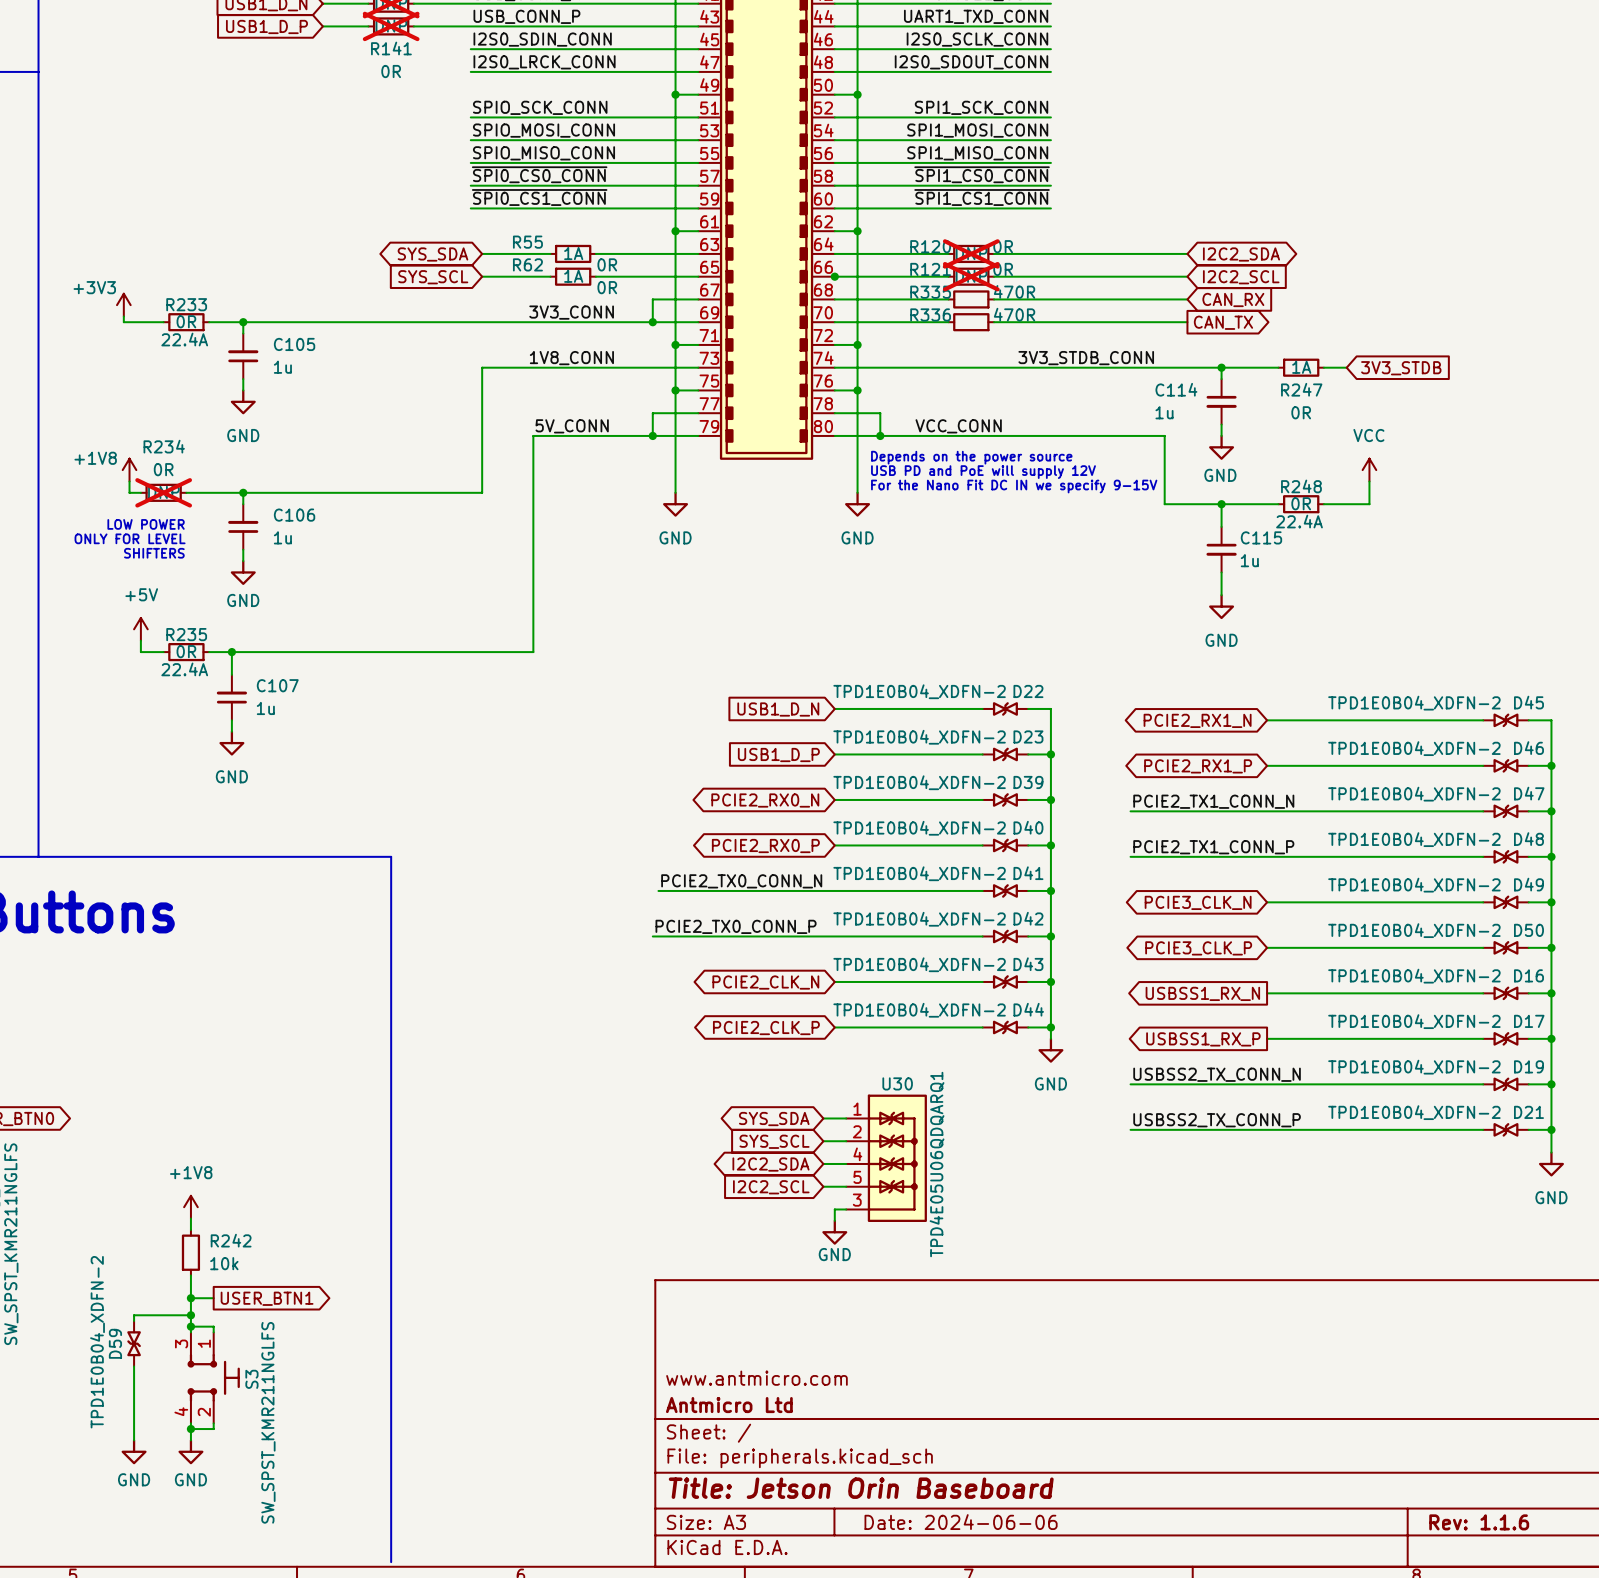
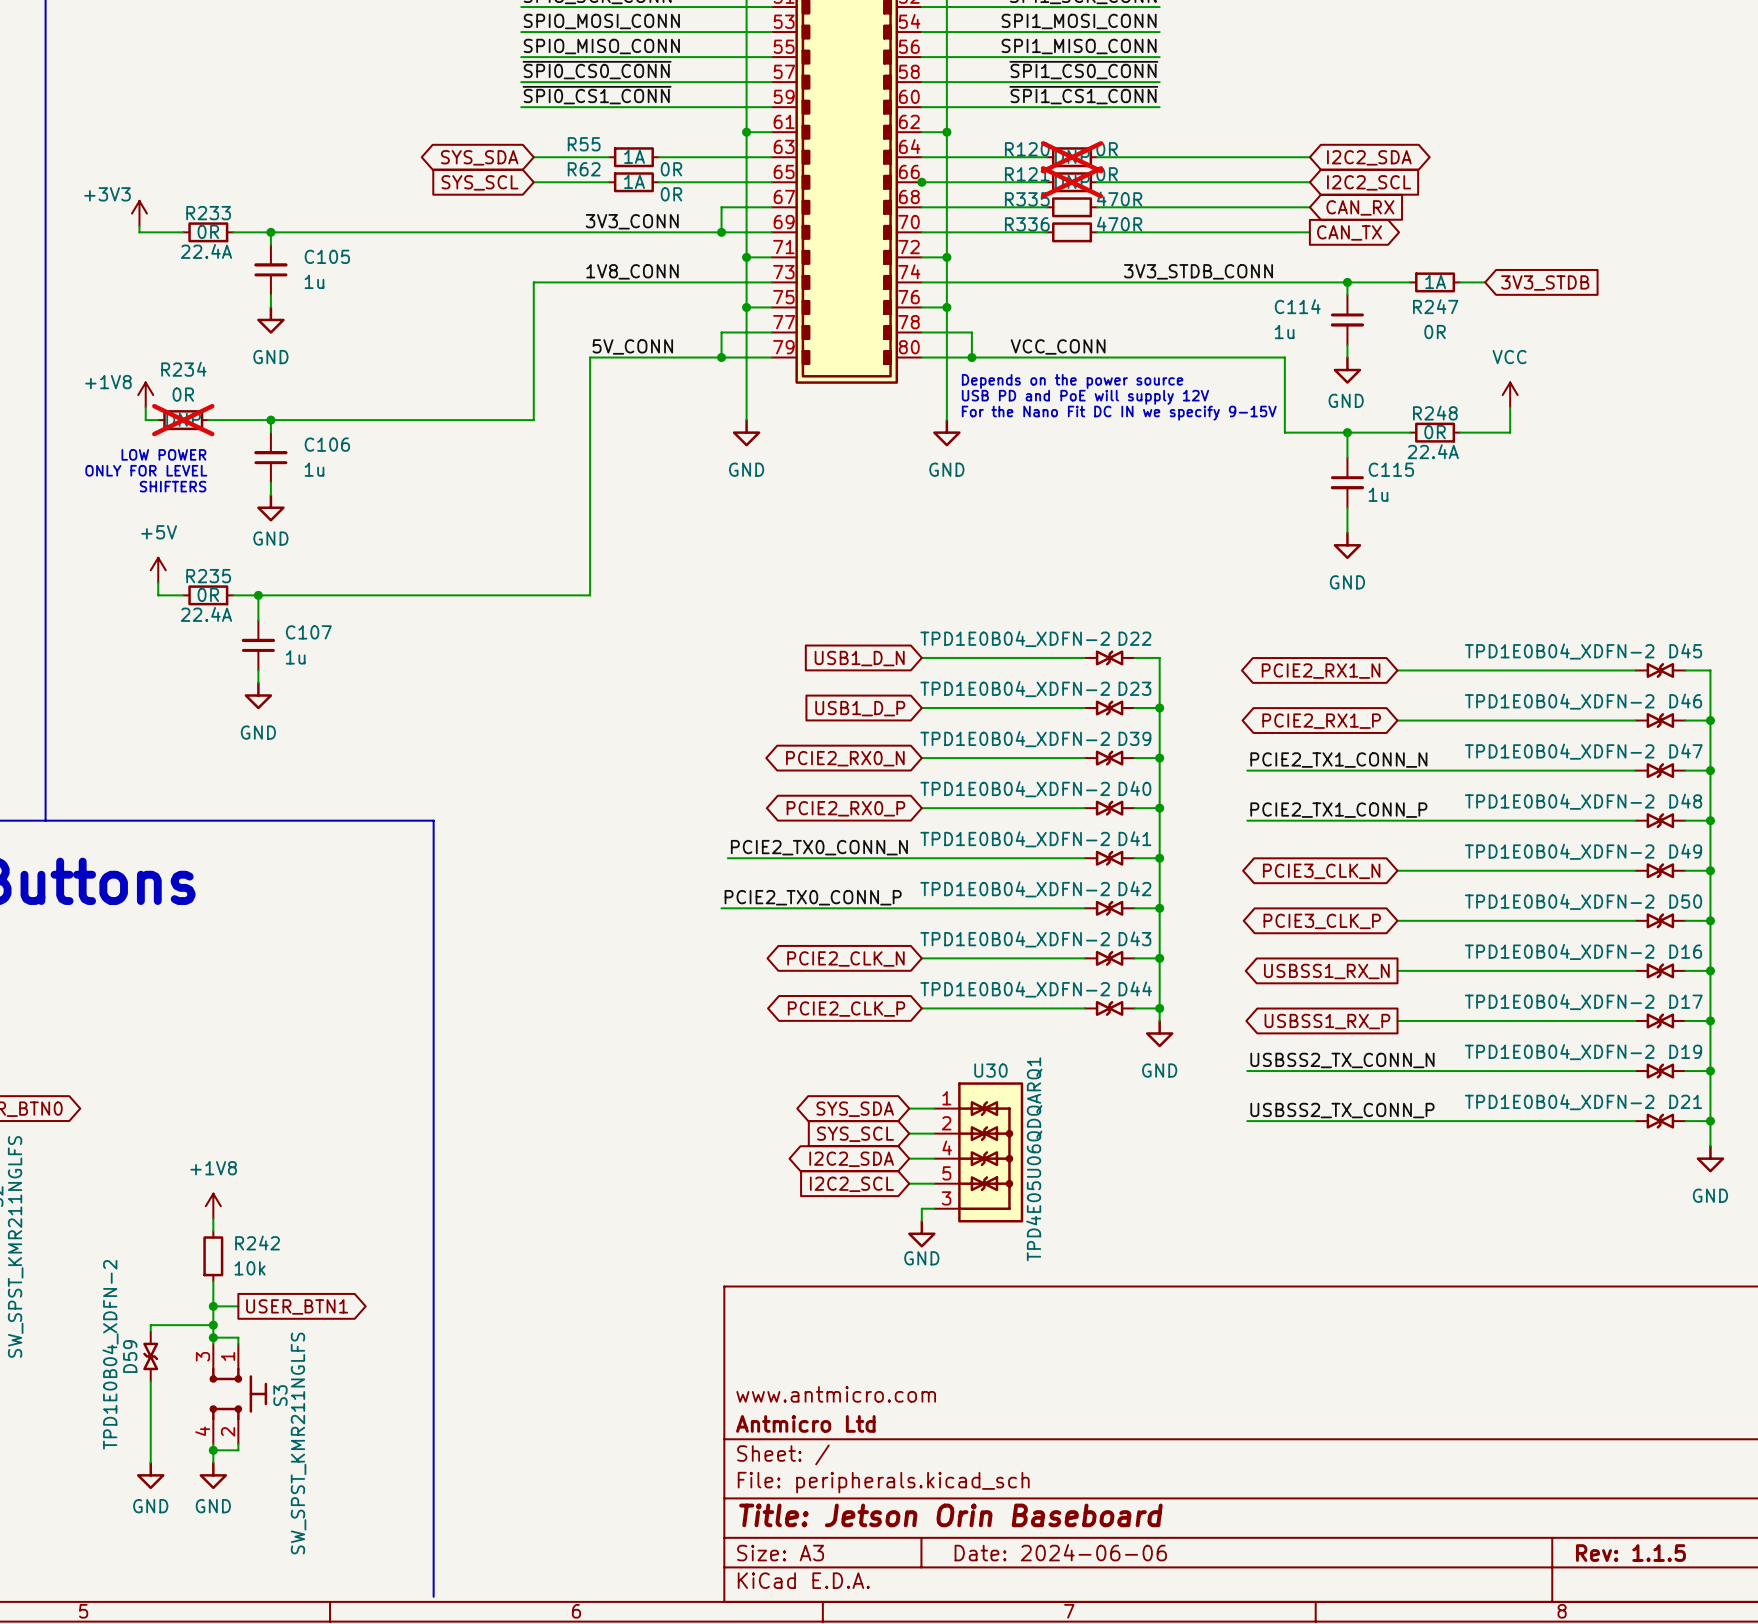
title block: Rev: 1.1.6 (1479, 1522) -> Rev: 1.1.5 (1630, 1553)

